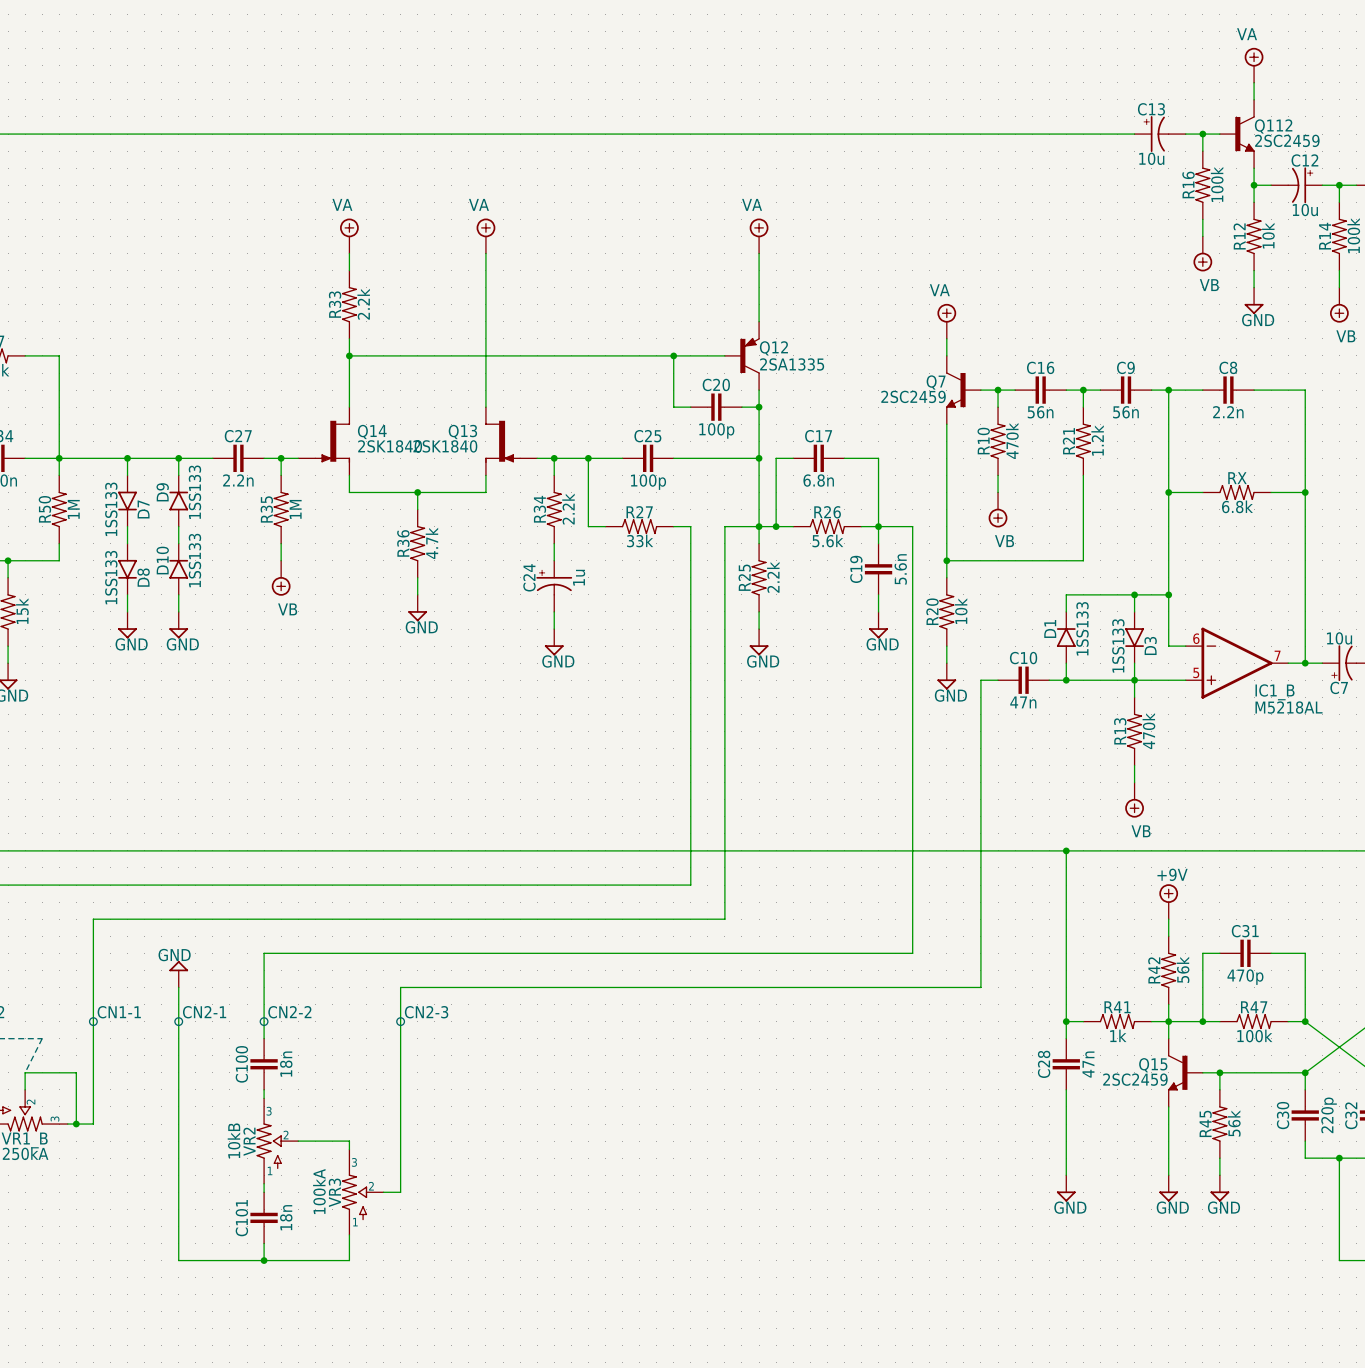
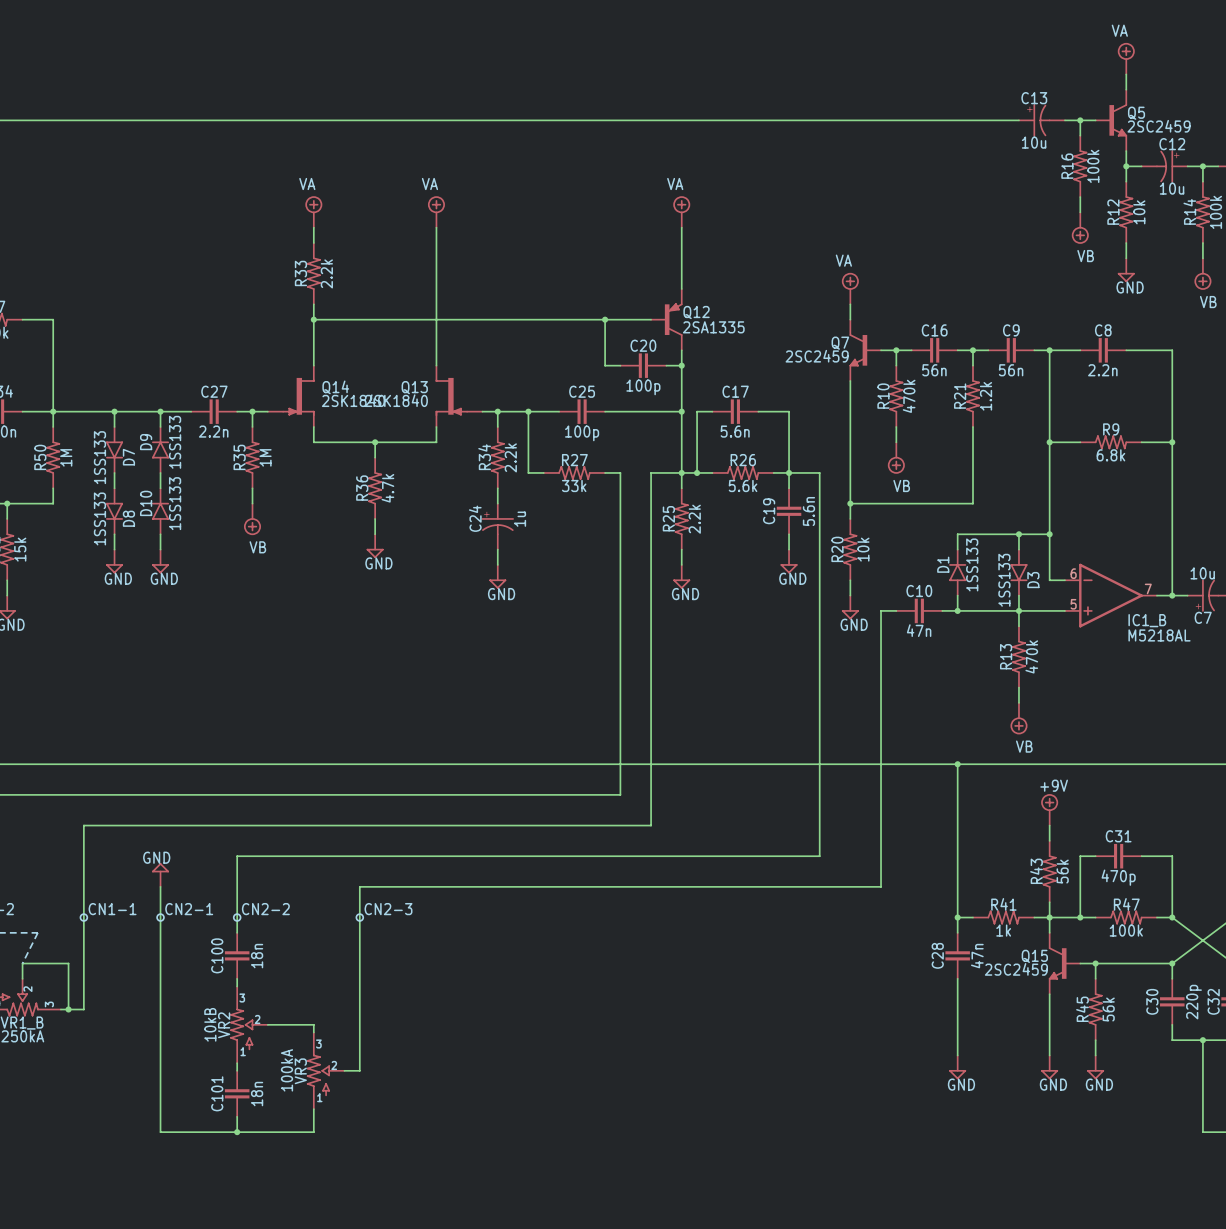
Q112 name: Q112 (1273, 126) -> Q5 (1136, 113)
RX name: RX (1237, 478) -> R9 (1111, 429)
C17 value: 6.8n (818, 480) -> 5.6n (735, 431)
R42 name: R42 (1154, 970) -> R43 (1036, 871)

